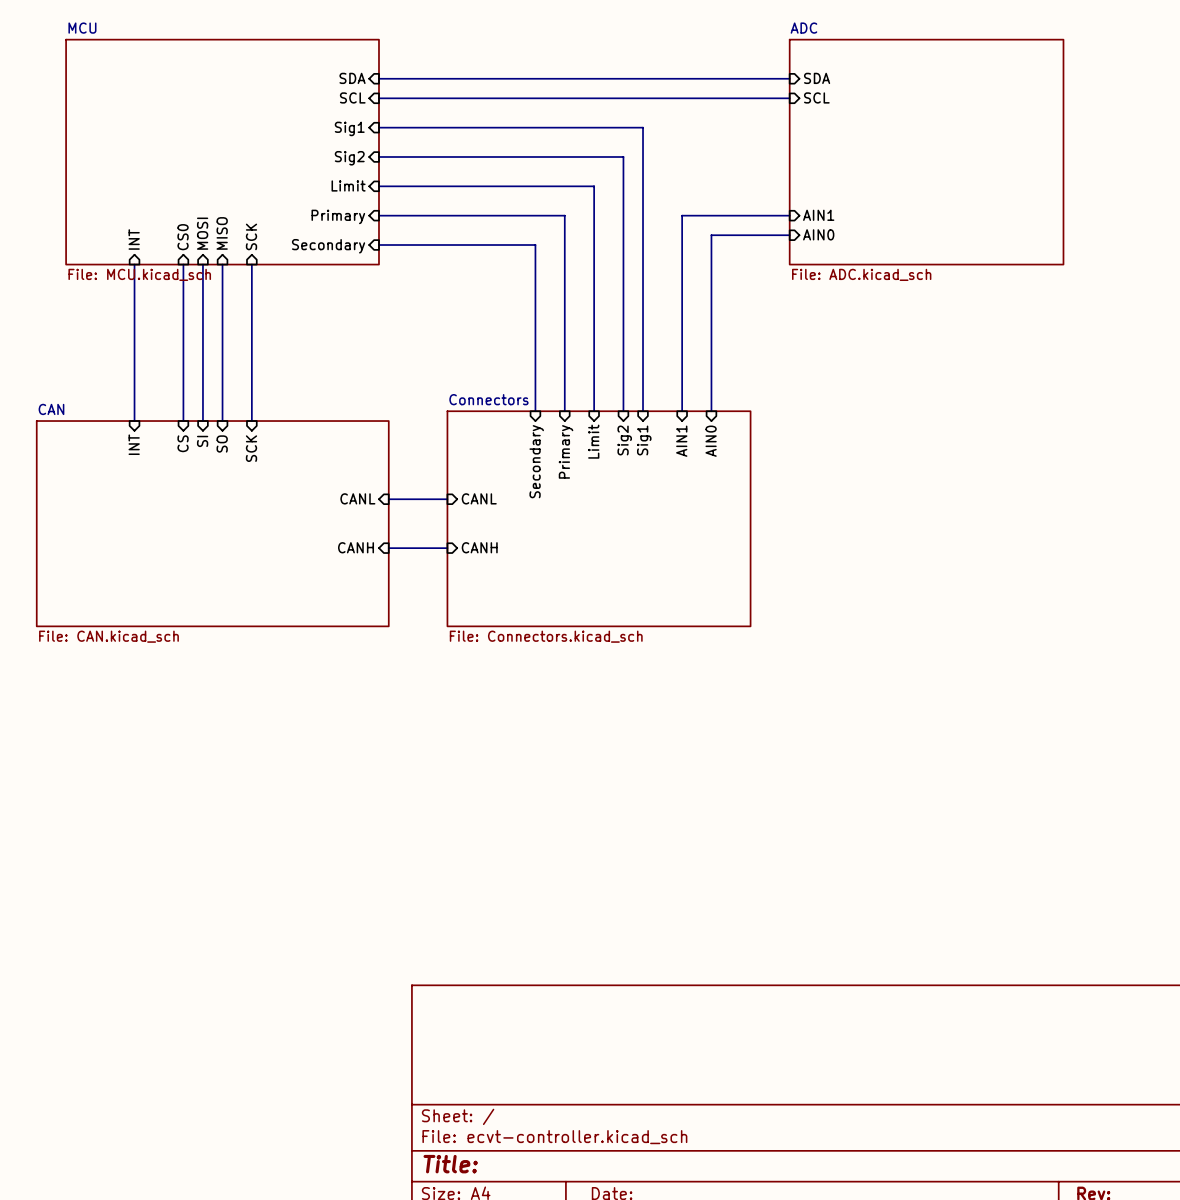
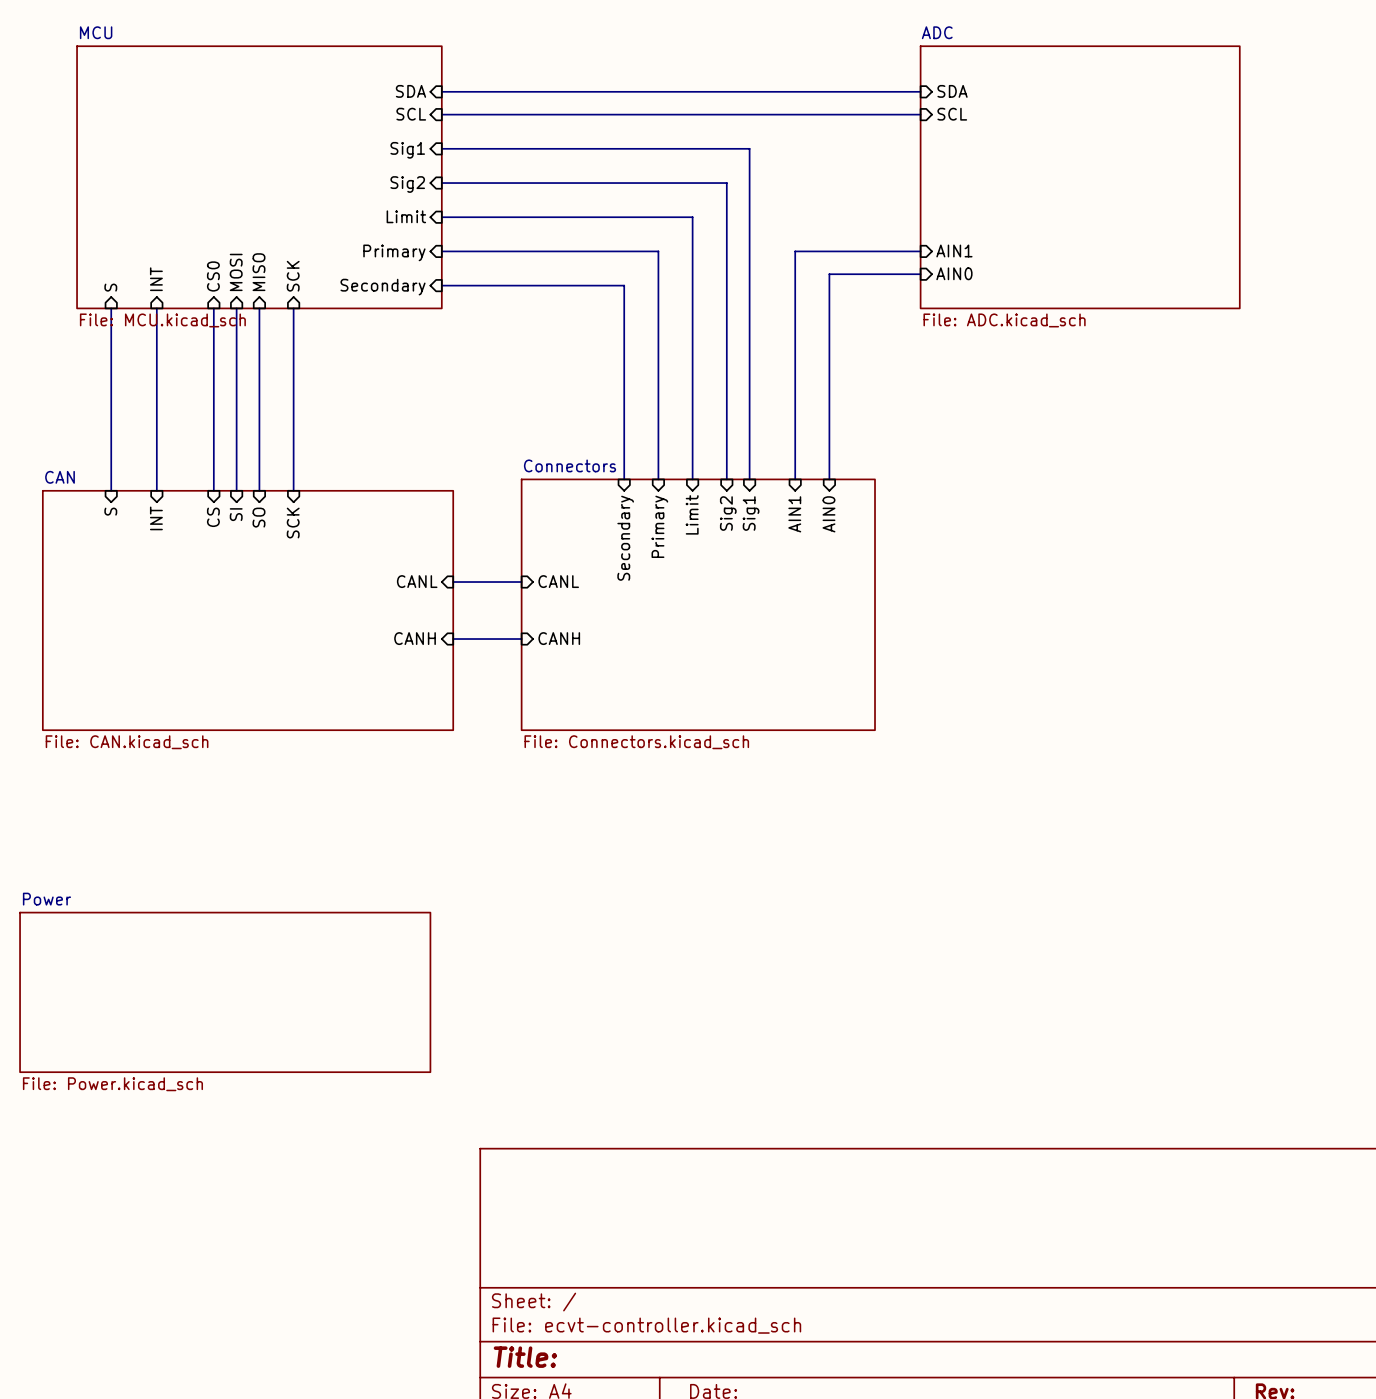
sheet pin: none -> S (110, 287)
wire: none -> (111, 308) (111, 490)
sheet pin: none -> S (110, 511)
sheet Power: none -> File: Power.kicad_sch (225, 992)

